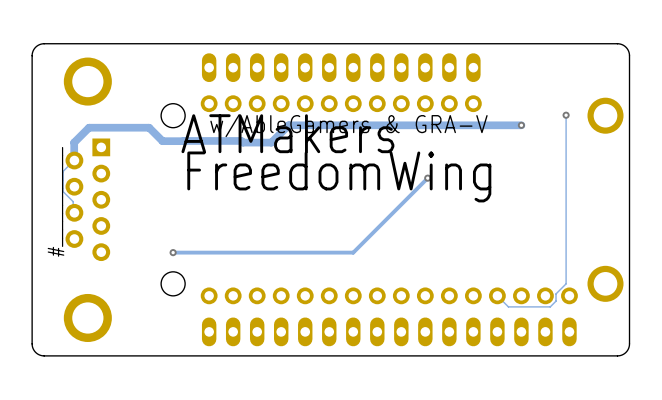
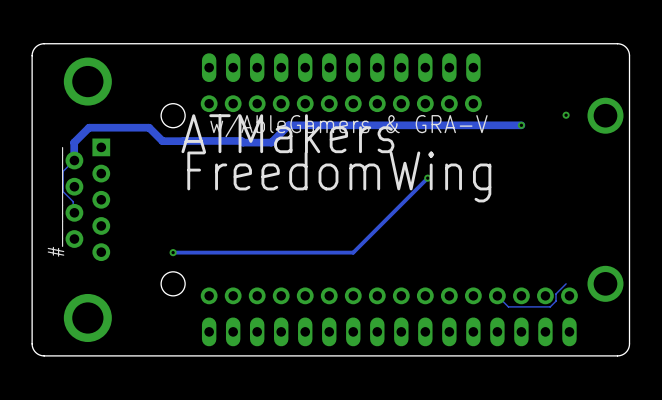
track: (566, 115) (566, 283) -> none

